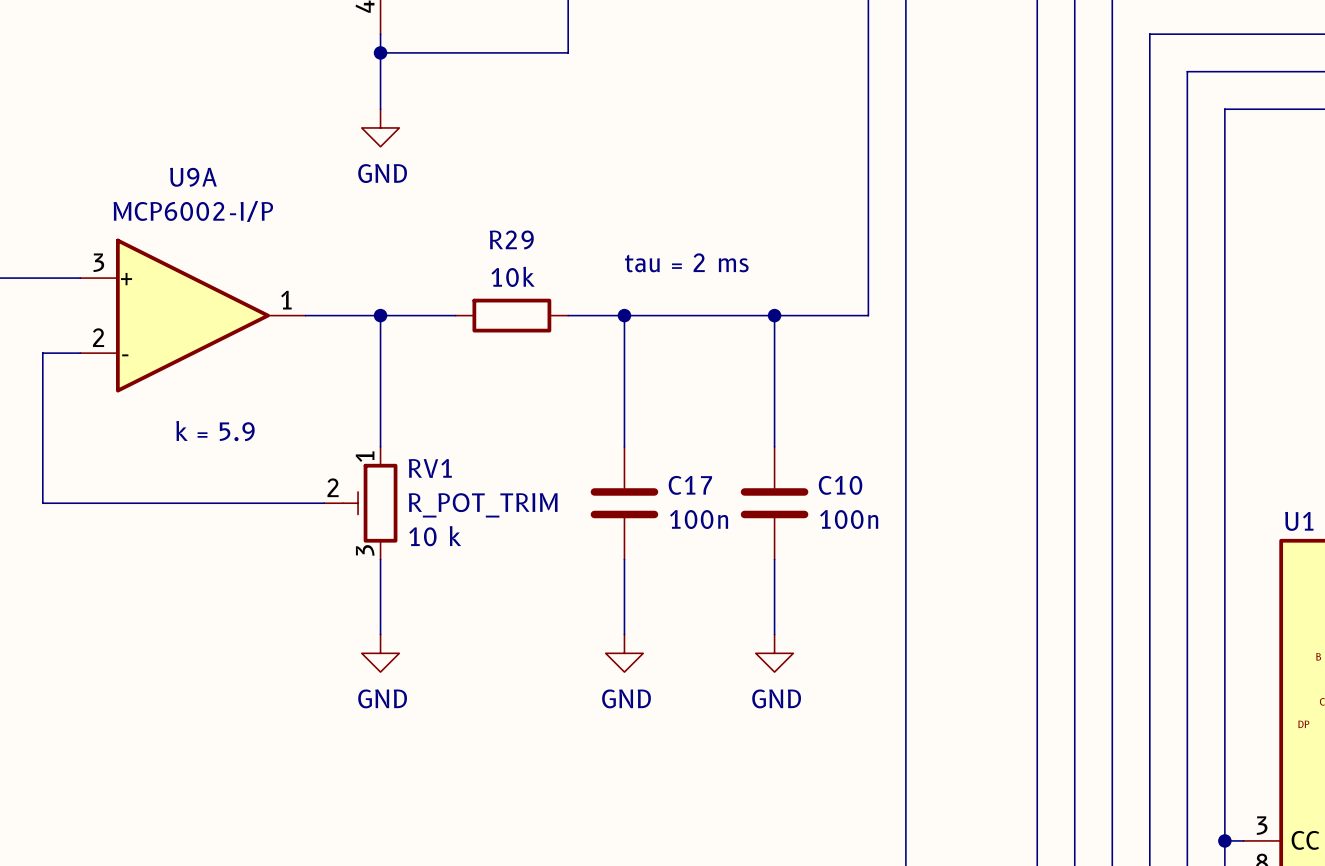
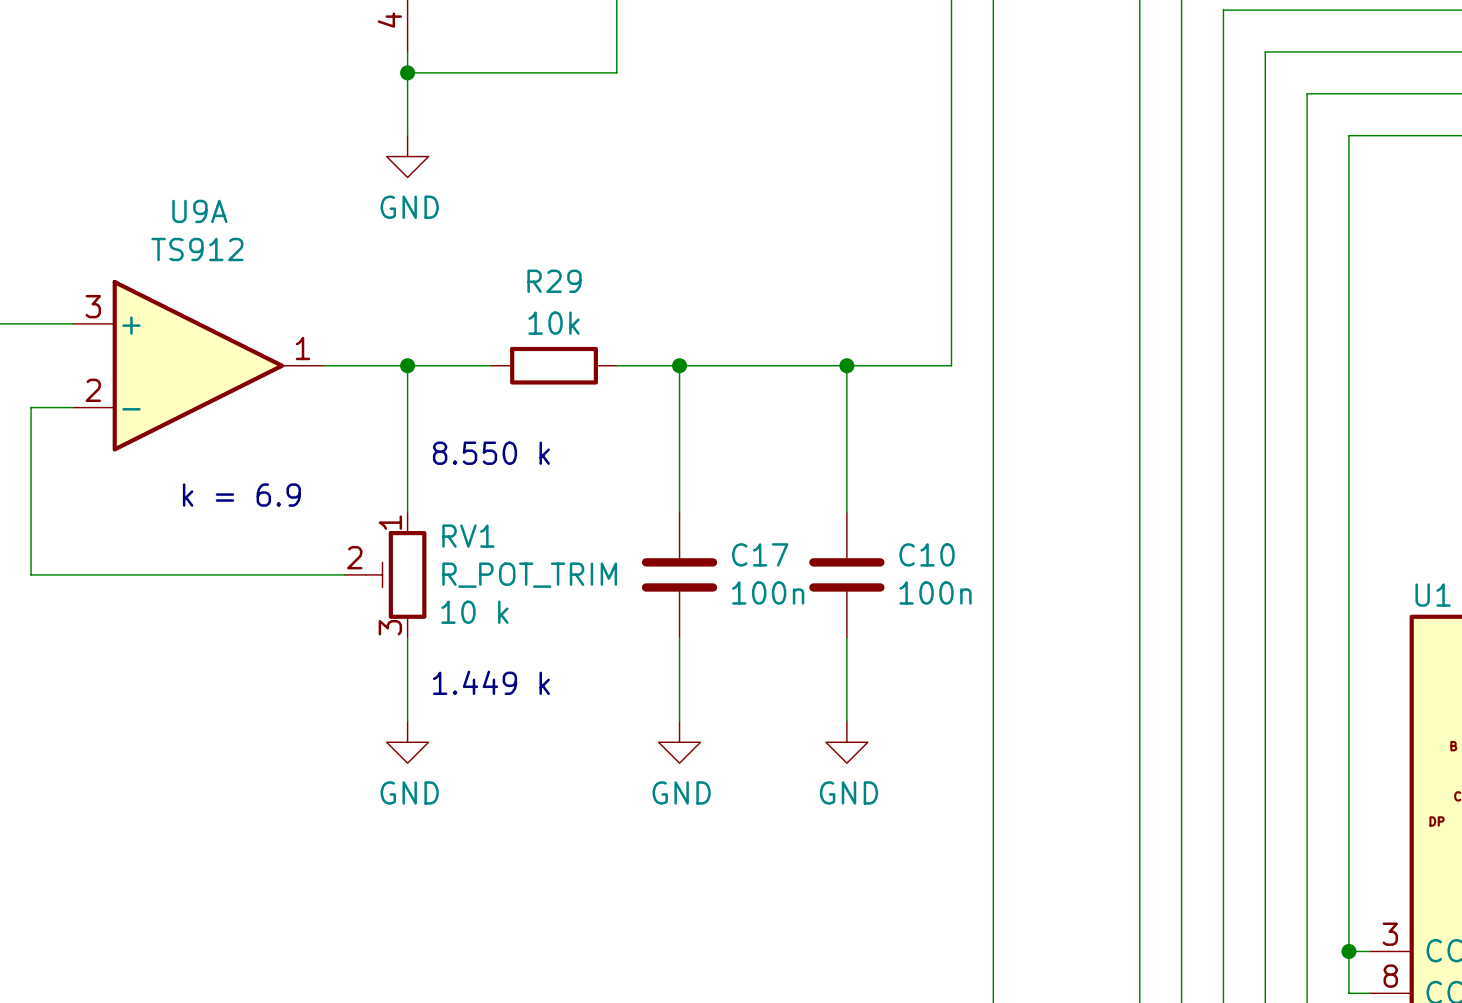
U9A value: MCP6002-I/P (193, 211) -> TS912 (197, 249)
text: tau = 2 ms (686, 262) -> none
text: none -> 8.550 k (491, 453)
text: k = 5.9 (215, 431) -> k = 6.9 (241, 495)
text: none -> 1.449 k (491, 682)

